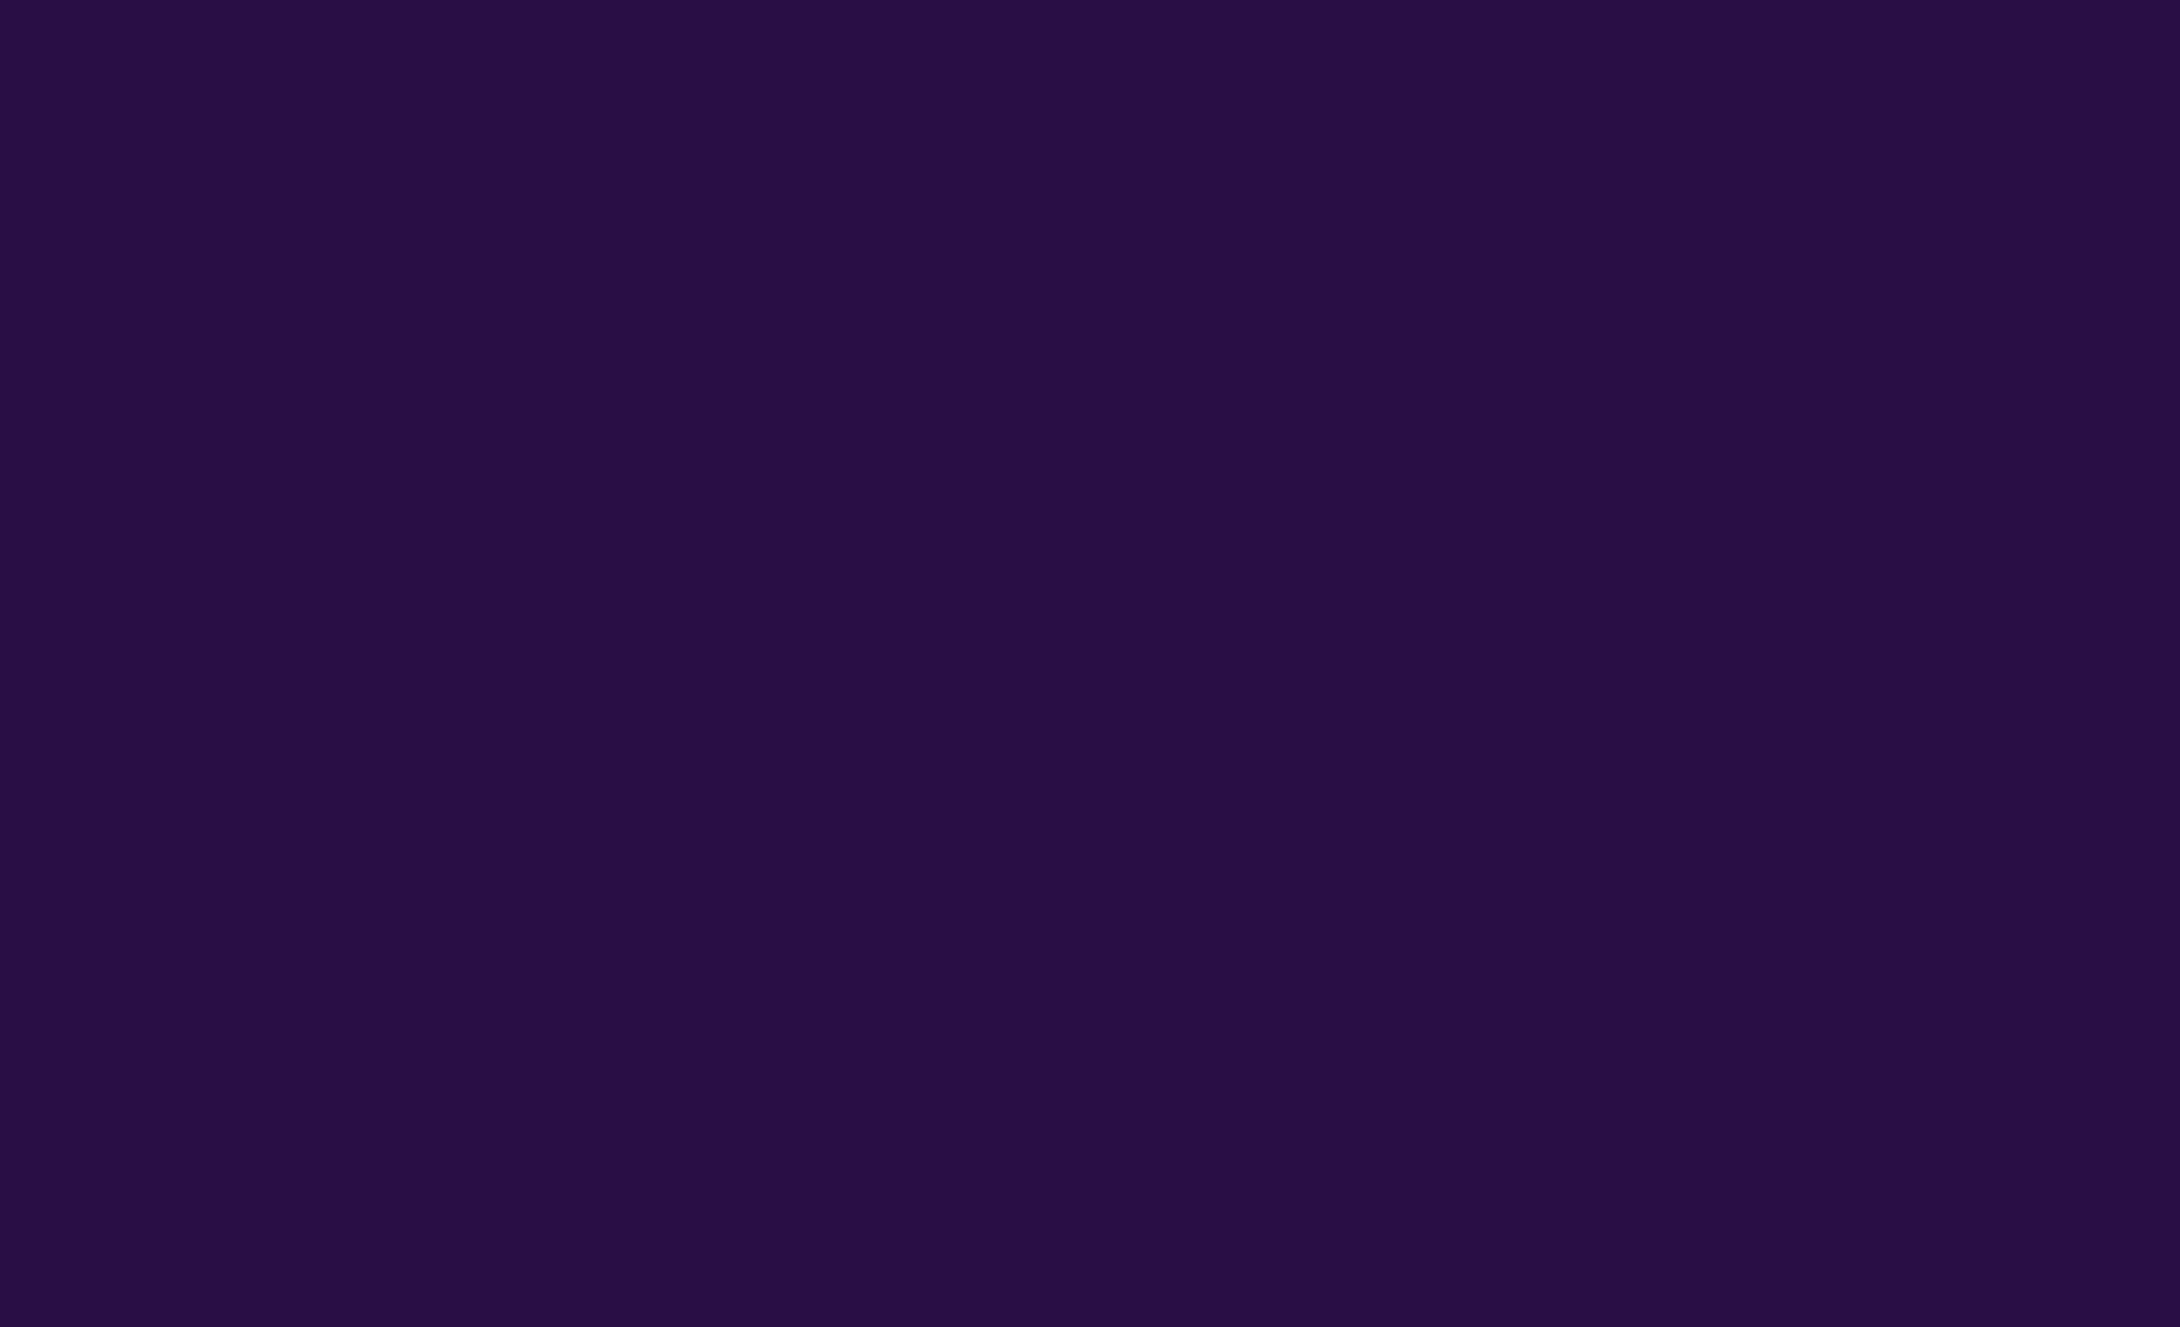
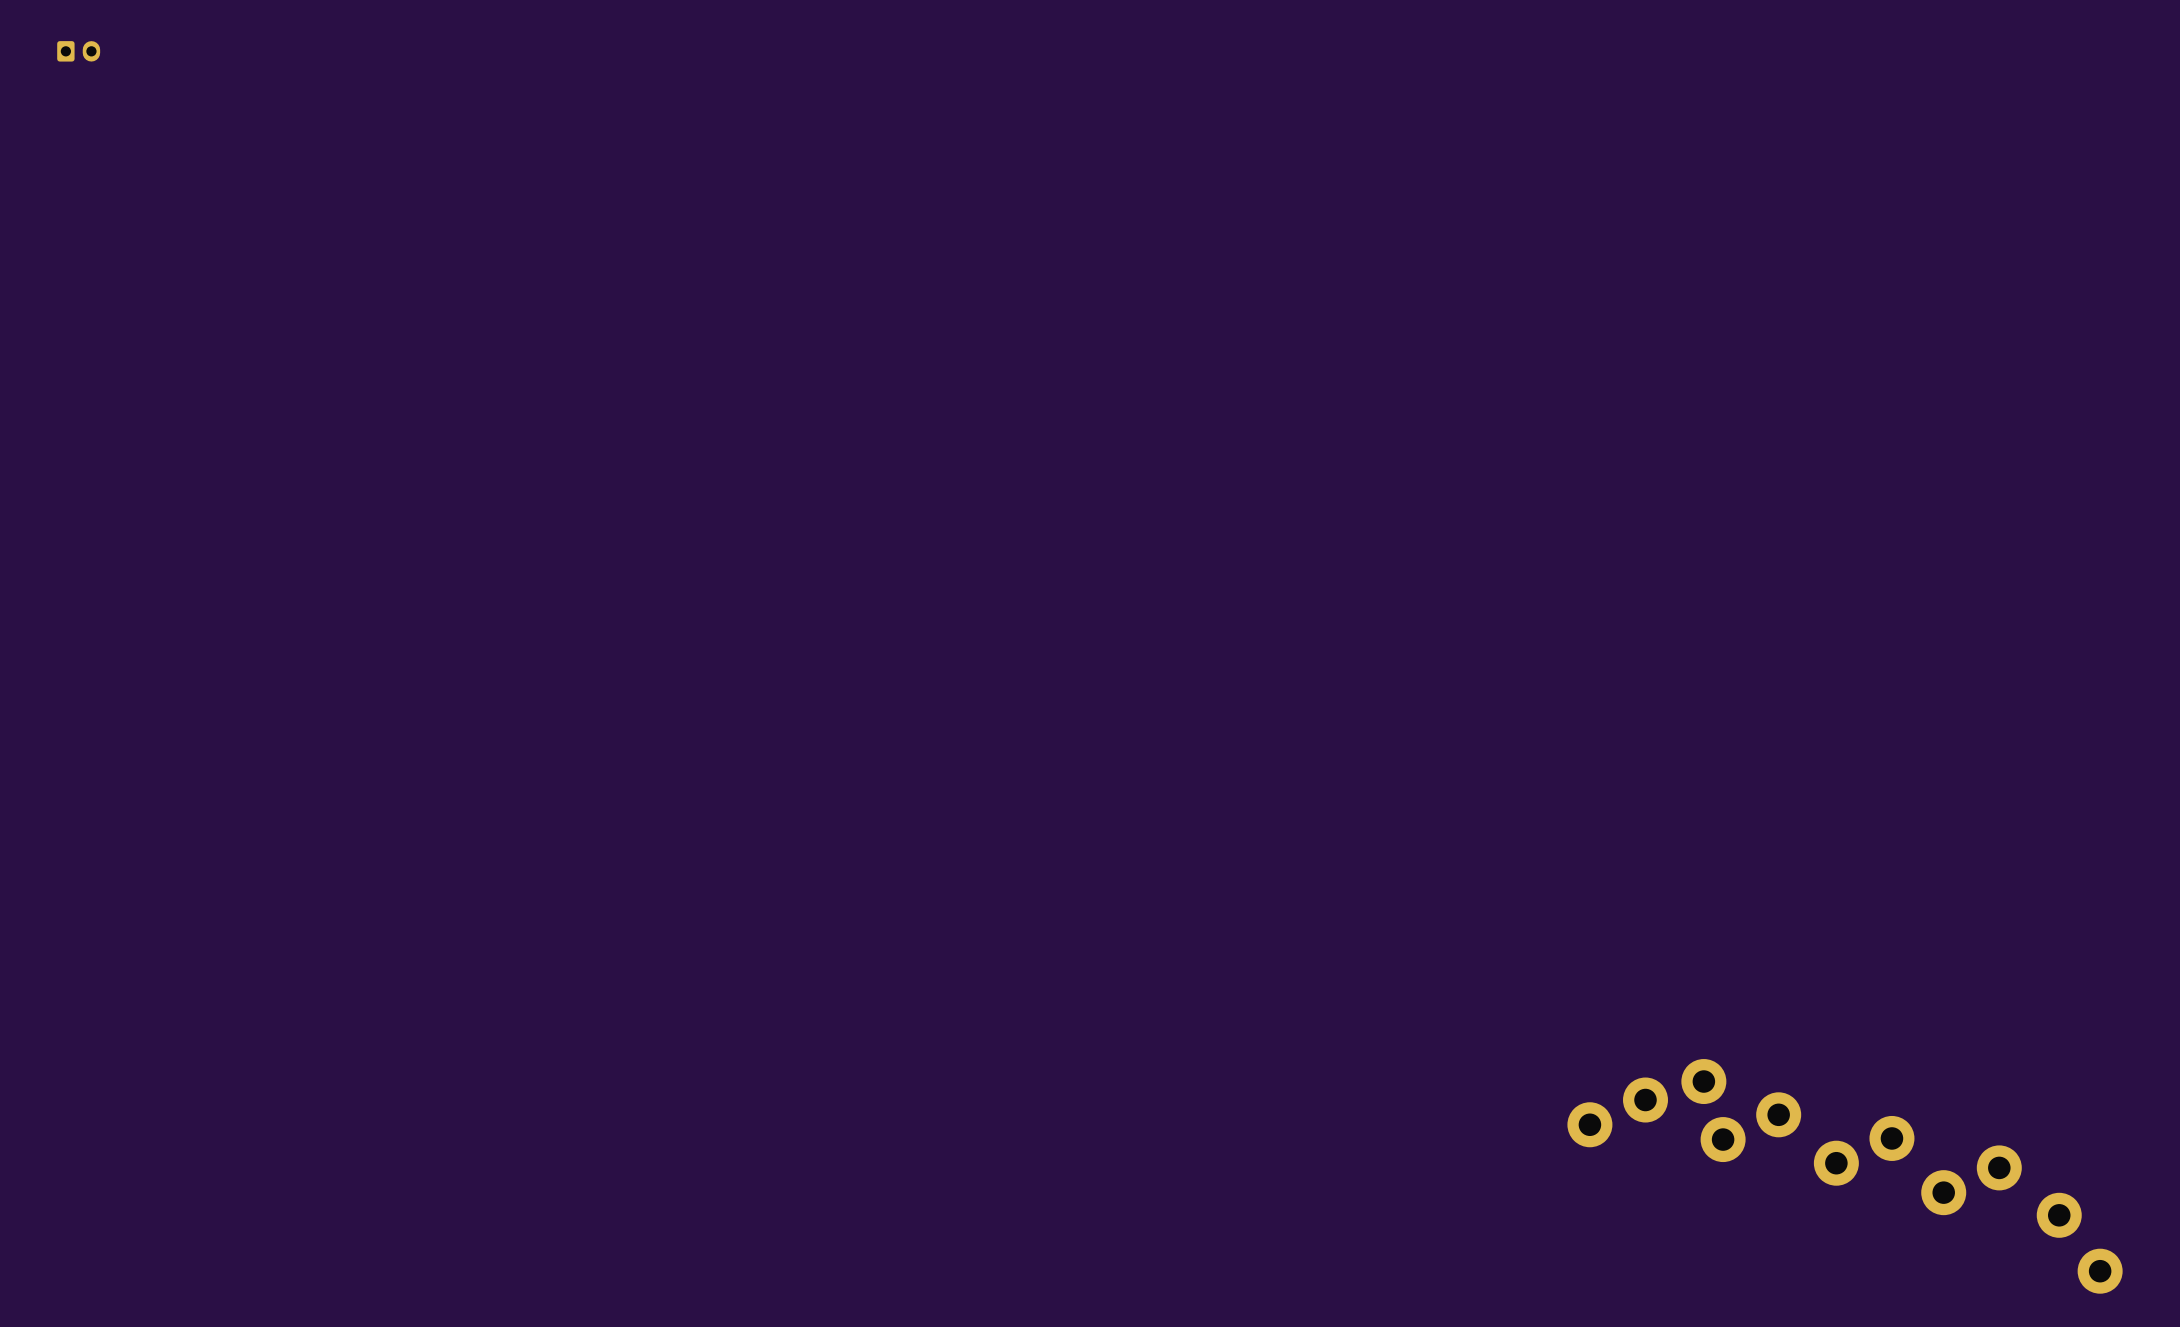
part: none -> (78, 51)
part: none -> (1703, 1081)
part: none -> (1645, 1100)
part: none -> (1778, 1114)
part: none -> (1589, 1124)
part: none -> (1891, 1138)
part: none -> (1723, 1139)
part: none -> (1836, 1163)
part: none -> (1999, 1167)
part: none -> (1943, 1192)
part: none -> (2059, 1215)
part: none -> (2100, 1271)

